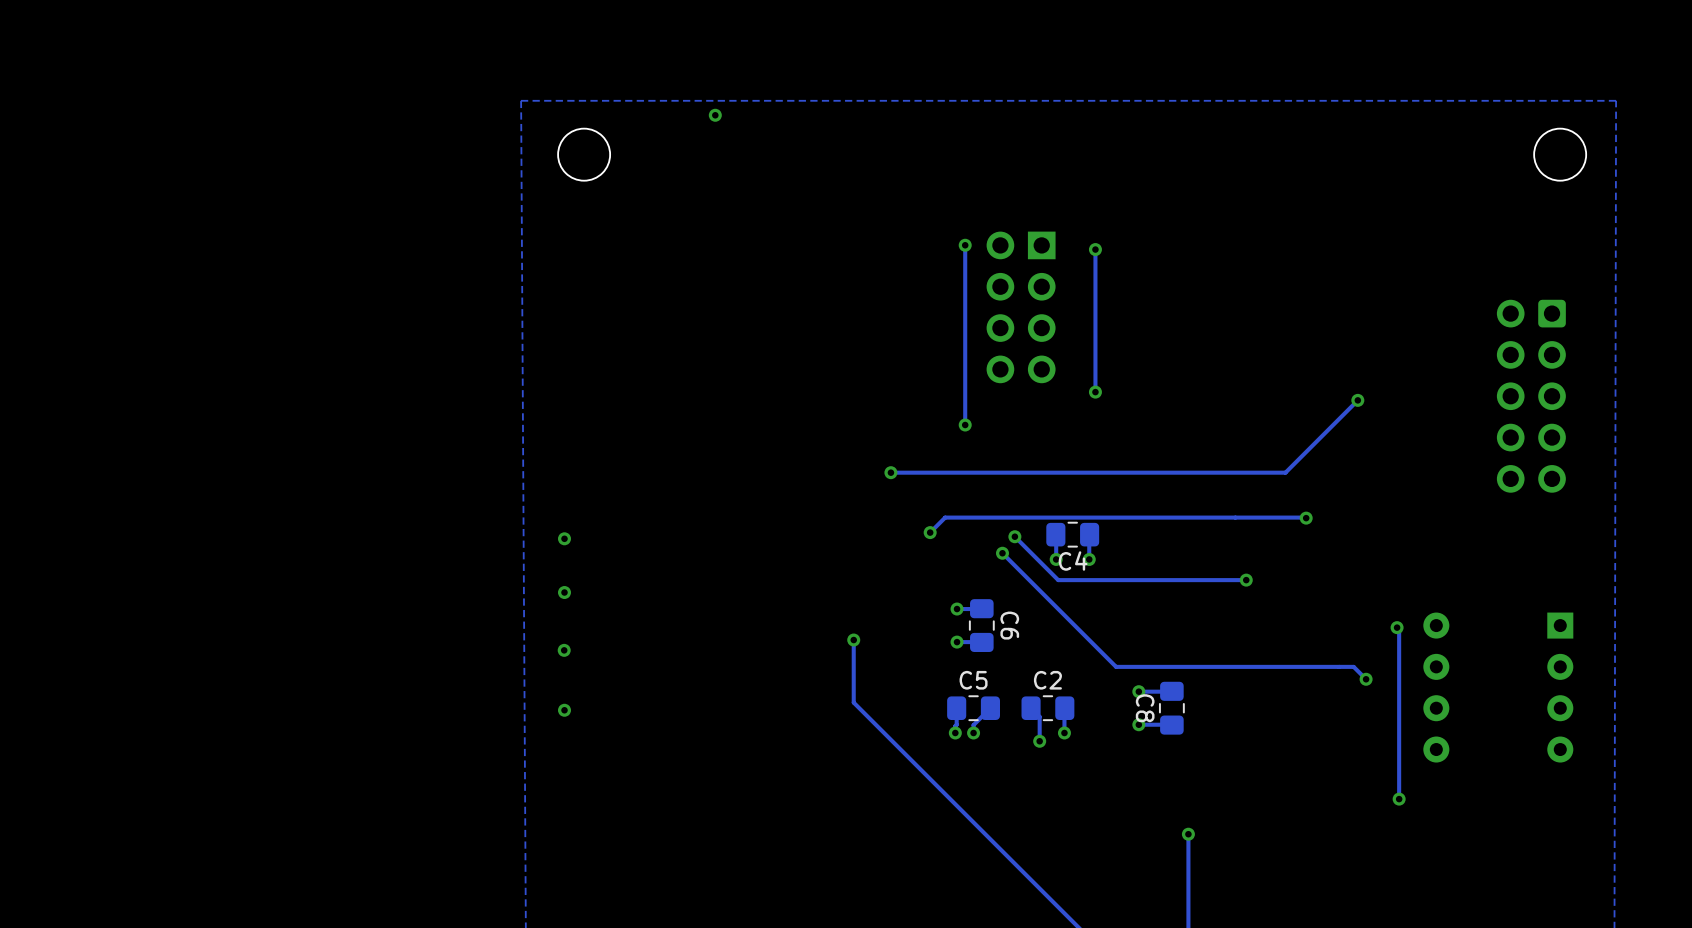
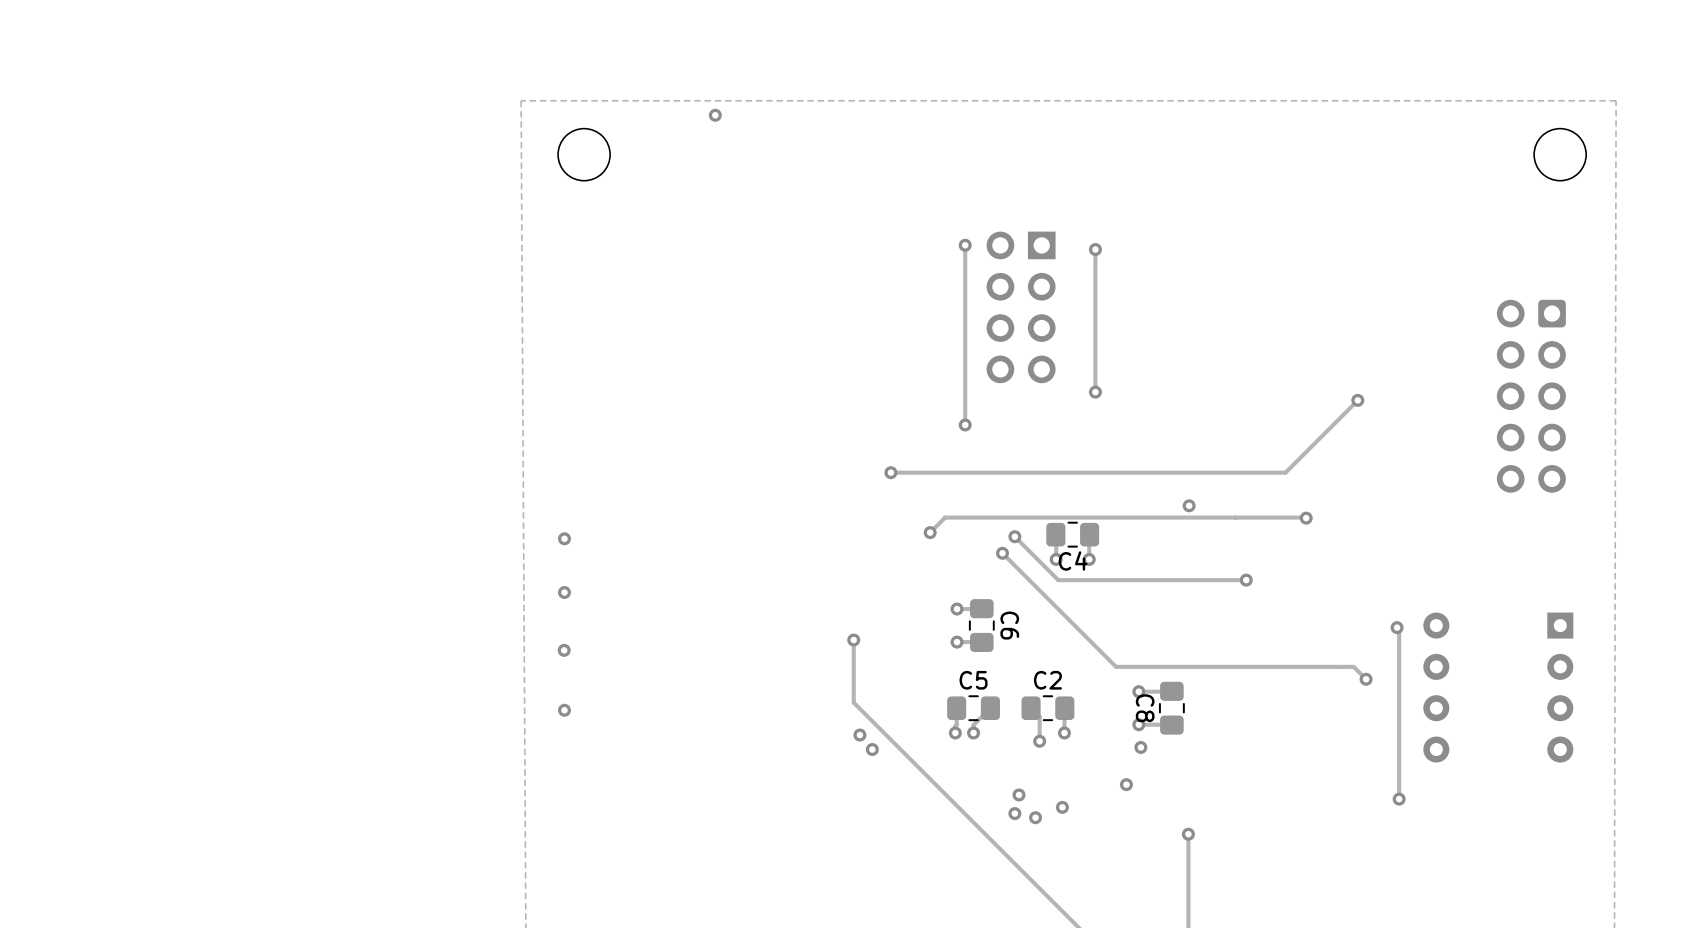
via: none -> (1189, 505)
via: none -> (859, 735)
via: none -> (1140, 747)
via: none -> (872, 749)
via: none -> (1126, 784)
via: none -> (1019, 794)
via: none -> (1062, 807)
via: none -> (1014, 813)
via: none -> (1035, 817)

